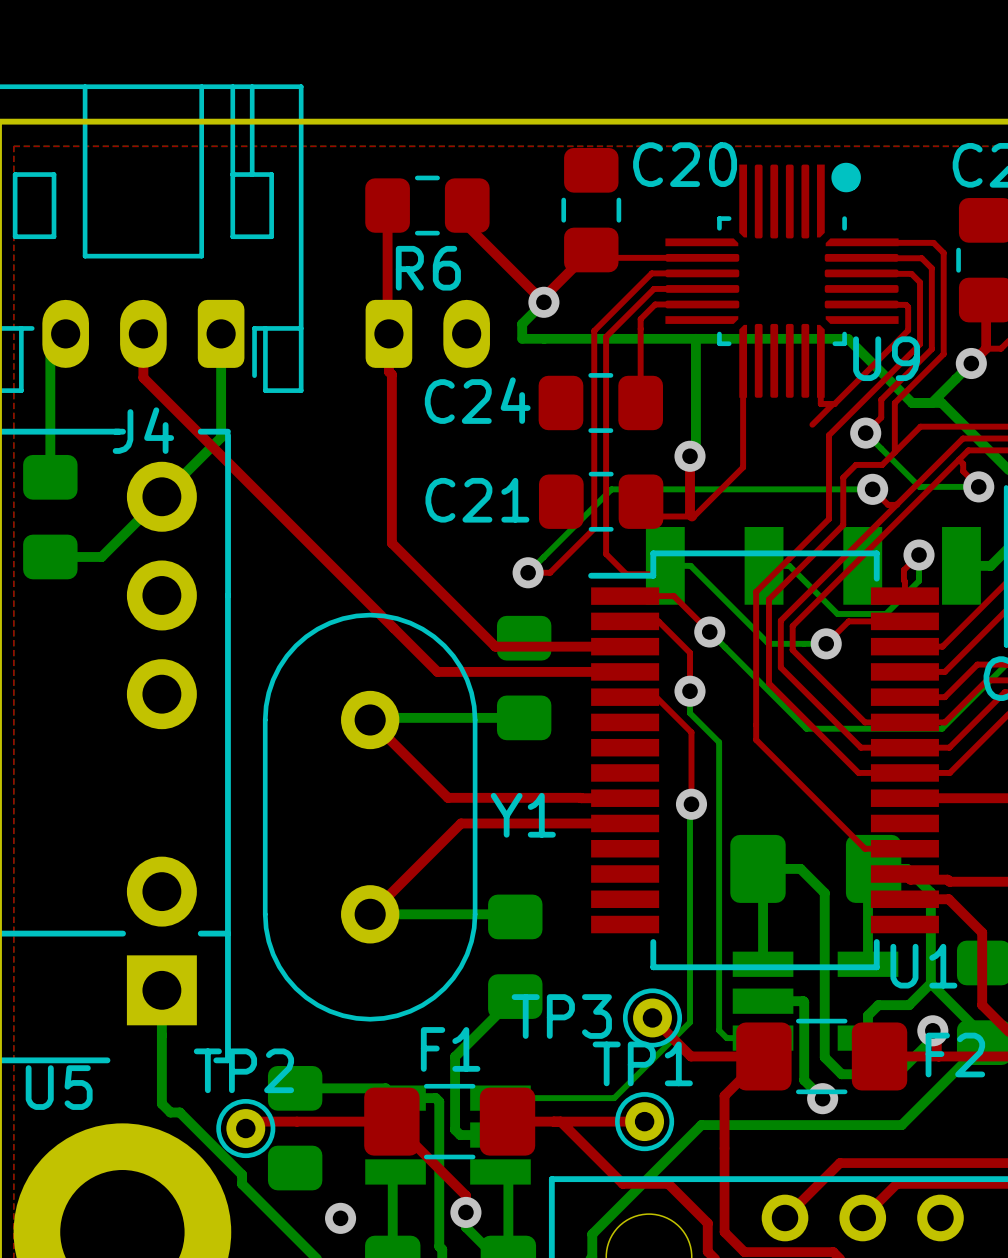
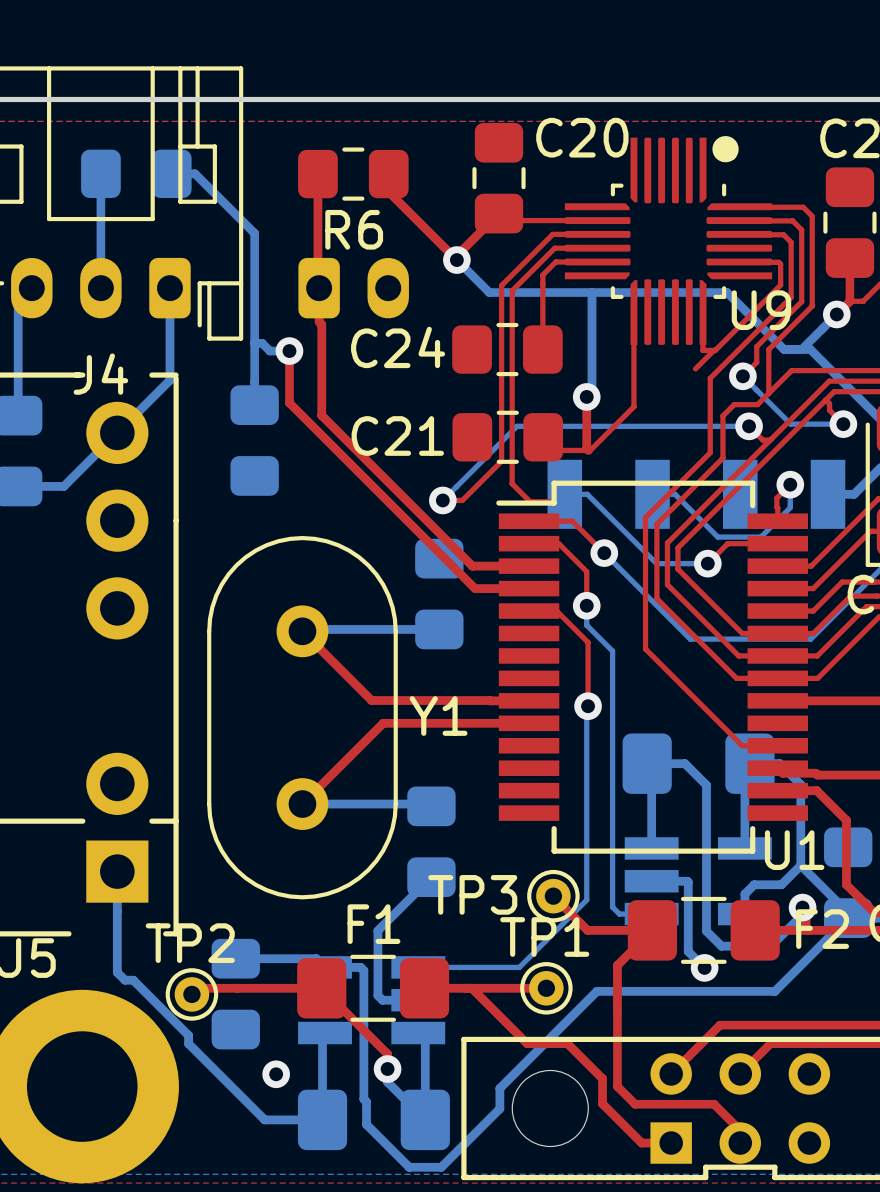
bottom track: none -> (100, 173) (100, 288)
part: none -> (136, 173)
bottom track: none -> (171, 173) (195, 173) (254, 233) (254, 405)
bottom track: (543, 302) (522, 324) (522, 338) (580, 338) -> (463, 266) (456, 260) (489, 292)
top track: (143, 333) (143, 377) (437, 671) (564, 671) -> (289, 351) (289, 403) (475, 588)
bottom track: none -> (254, 343) (262, 343) (269, 351) (289, 351)
via: none -> (289, 351)
top track: (391, 477) (391, 543) (495, 646) (561, 646) -> (321, 415) (472, 566)
part: none -> (254, 440)

